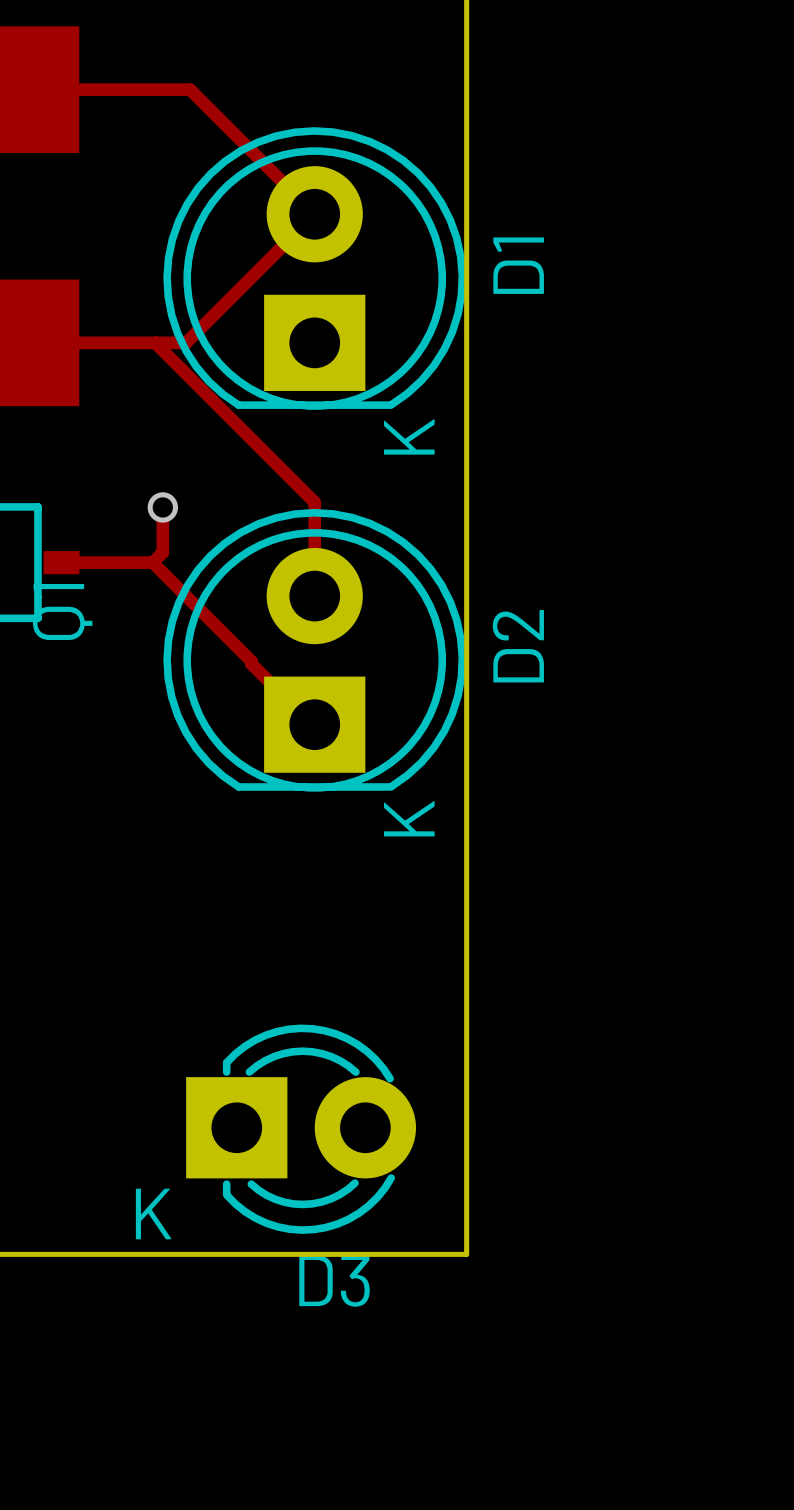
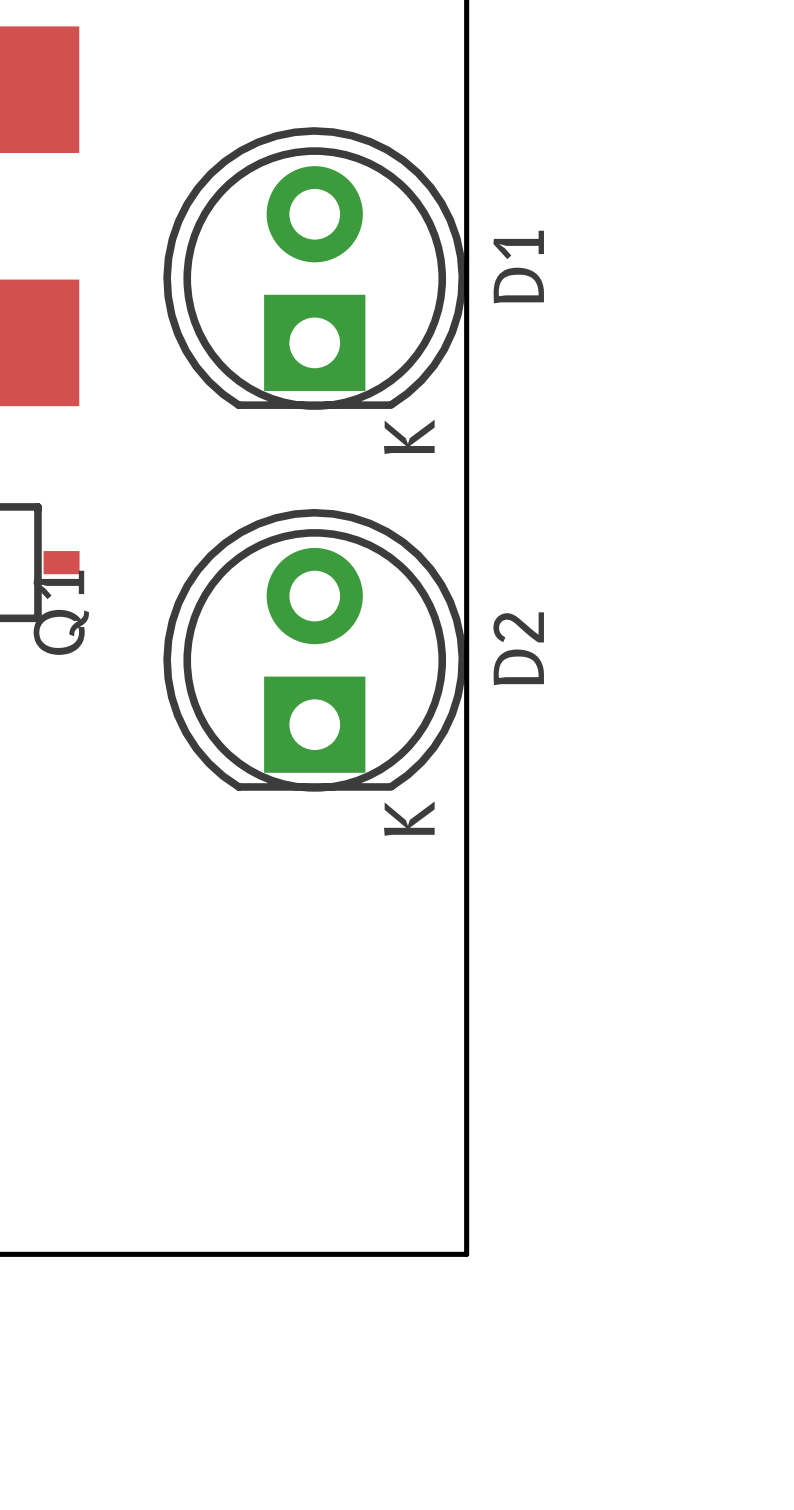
track: (18, 89) (190, 89) (314, 214) (186, 342) (18, 342) -> none
track: (155, 342) (314, 502) (314, 596) -> none
track: (162, 507) (162, 552) (152, 562) -> none
via: (162, 507) -> none
track: (61, 562) (152, 562) -> none
track: (152, 562) (312, 724) (314, 724) -> none
D3: (301, 1129) -> none

